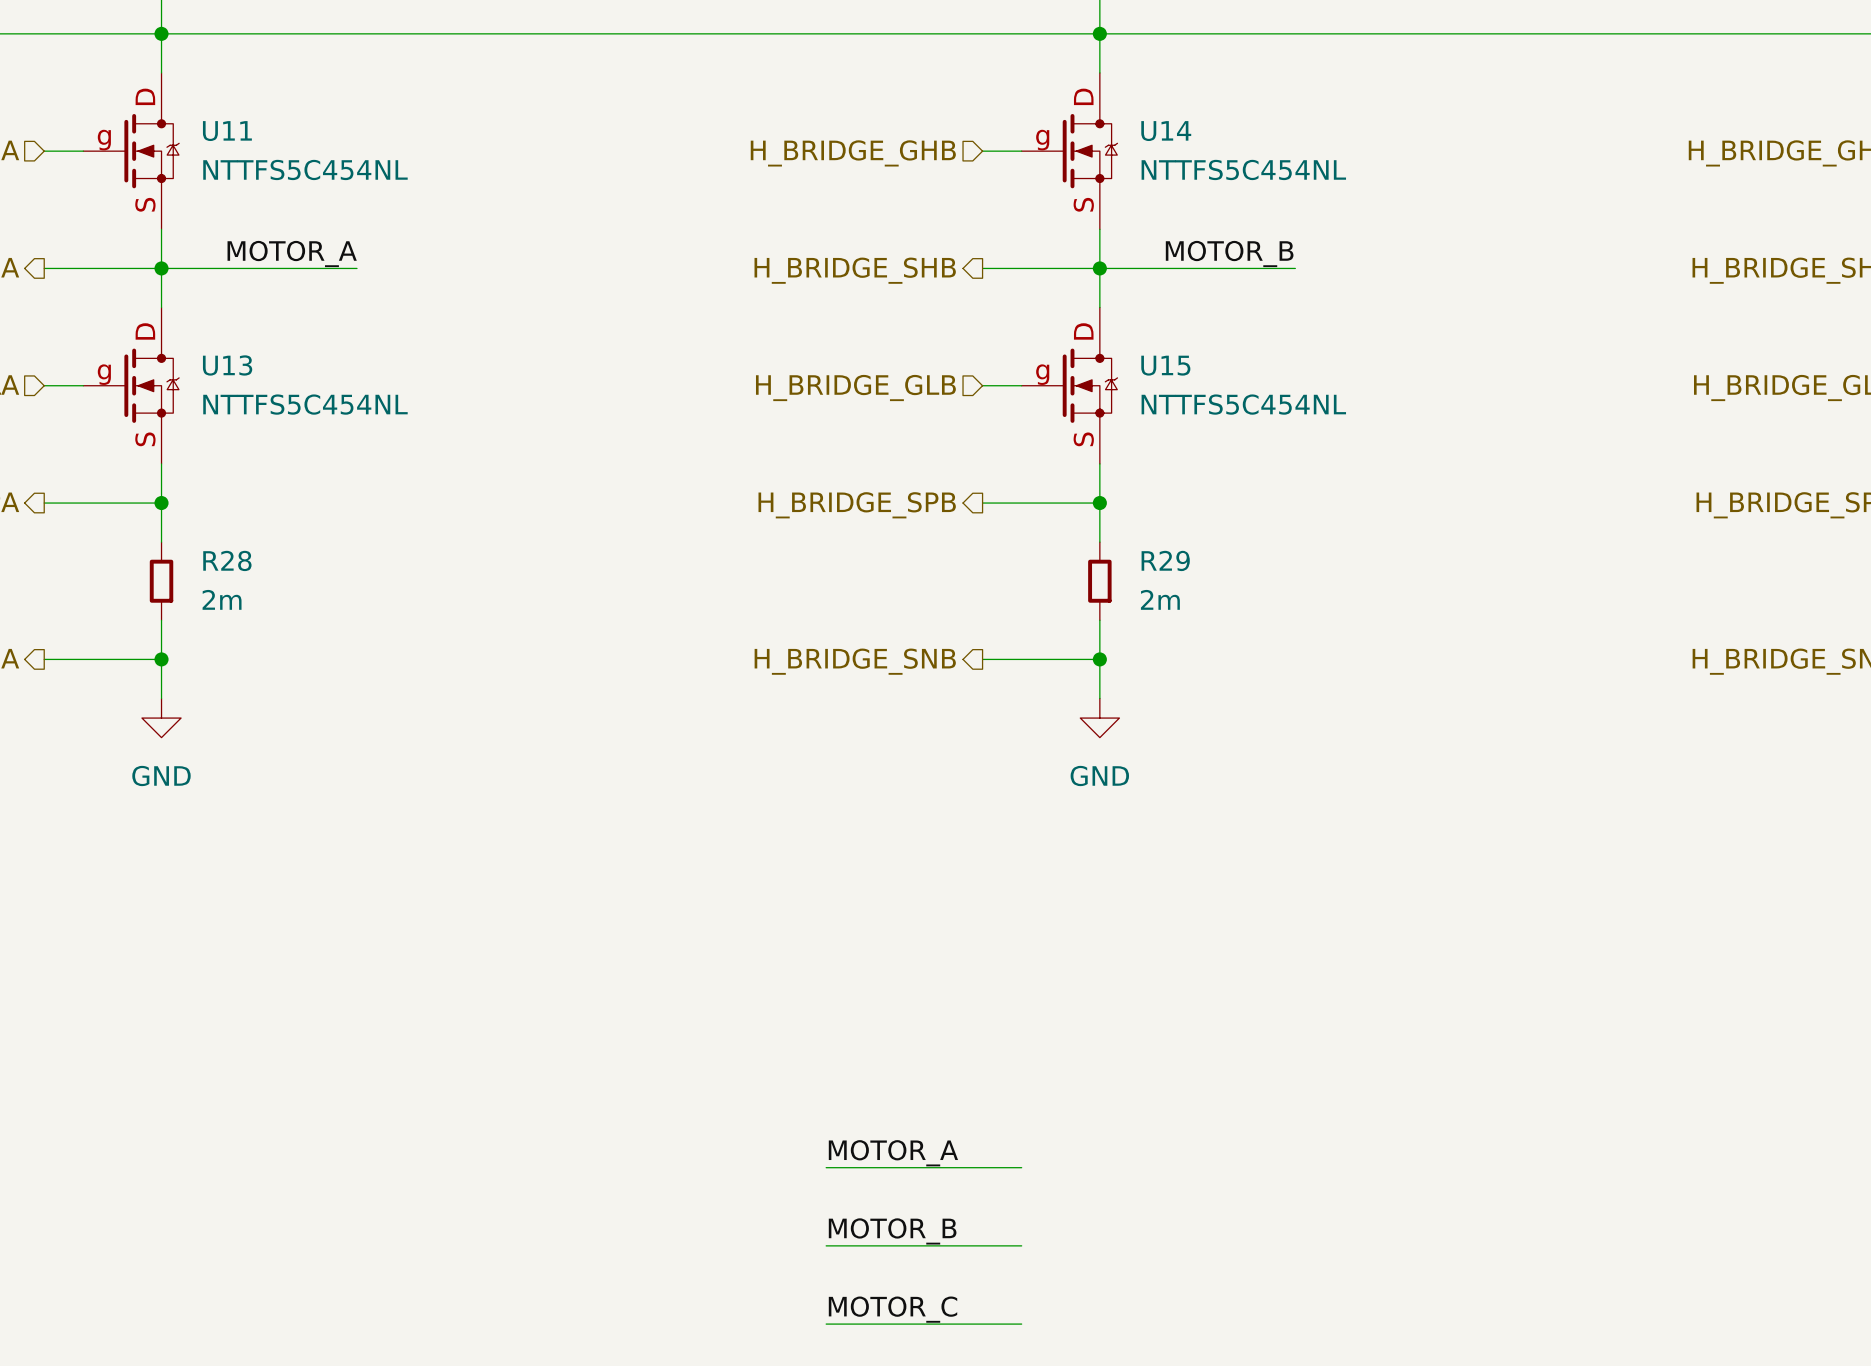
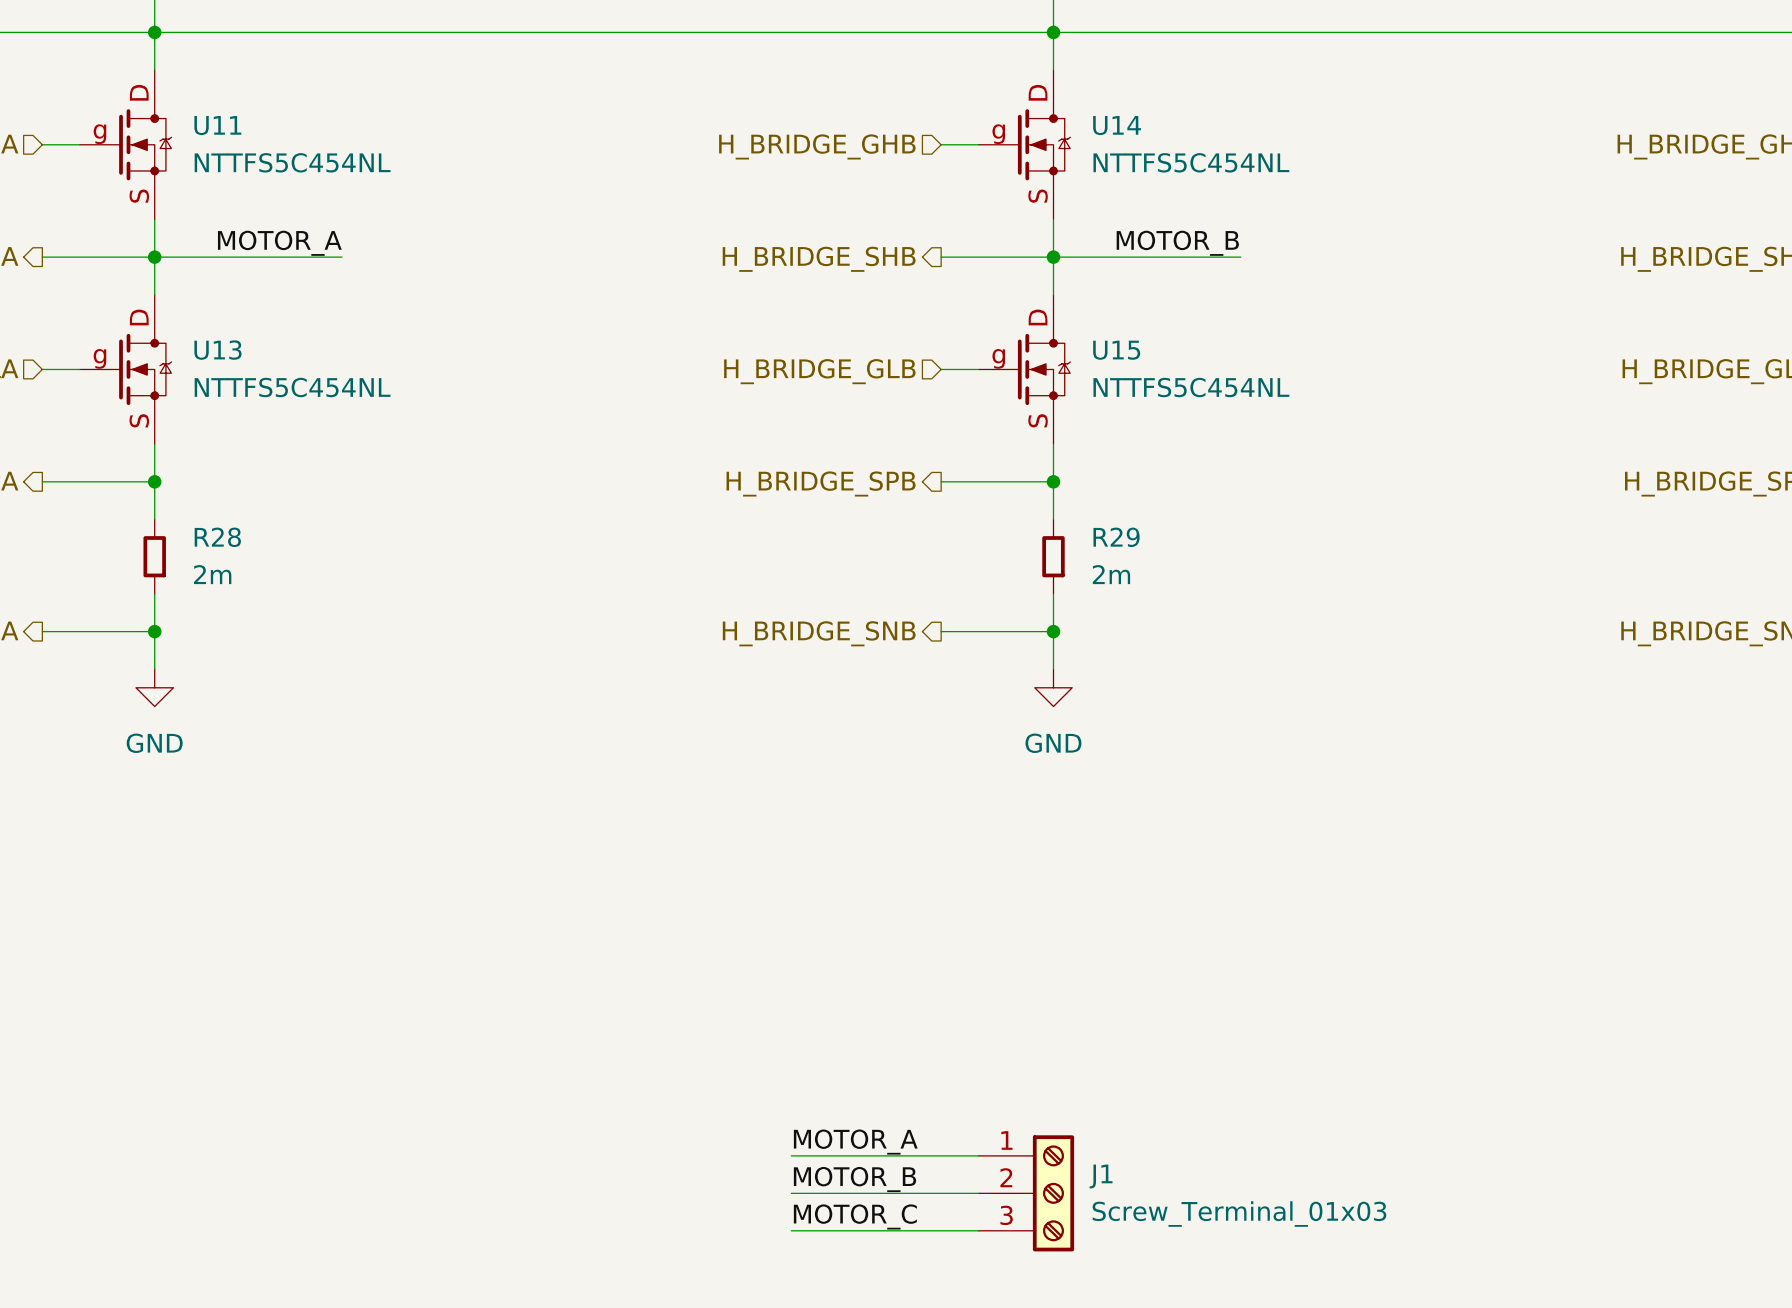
label position: MOTOR_A (893, 1153) -> MOTOR_A (855, 1142)
wire: (826, 1167) (1021, 1167) -> (791, 1155) (978, 1155)
J1: none -> Screw_Terminal_01x03 (1026, 1193)
label position: MOTOR_C (893, 1309) -> MOTOR_C (855, 1216)
wire: (826, 1324) (1021, 1324) -> (791, 1230) (978, 1230)

